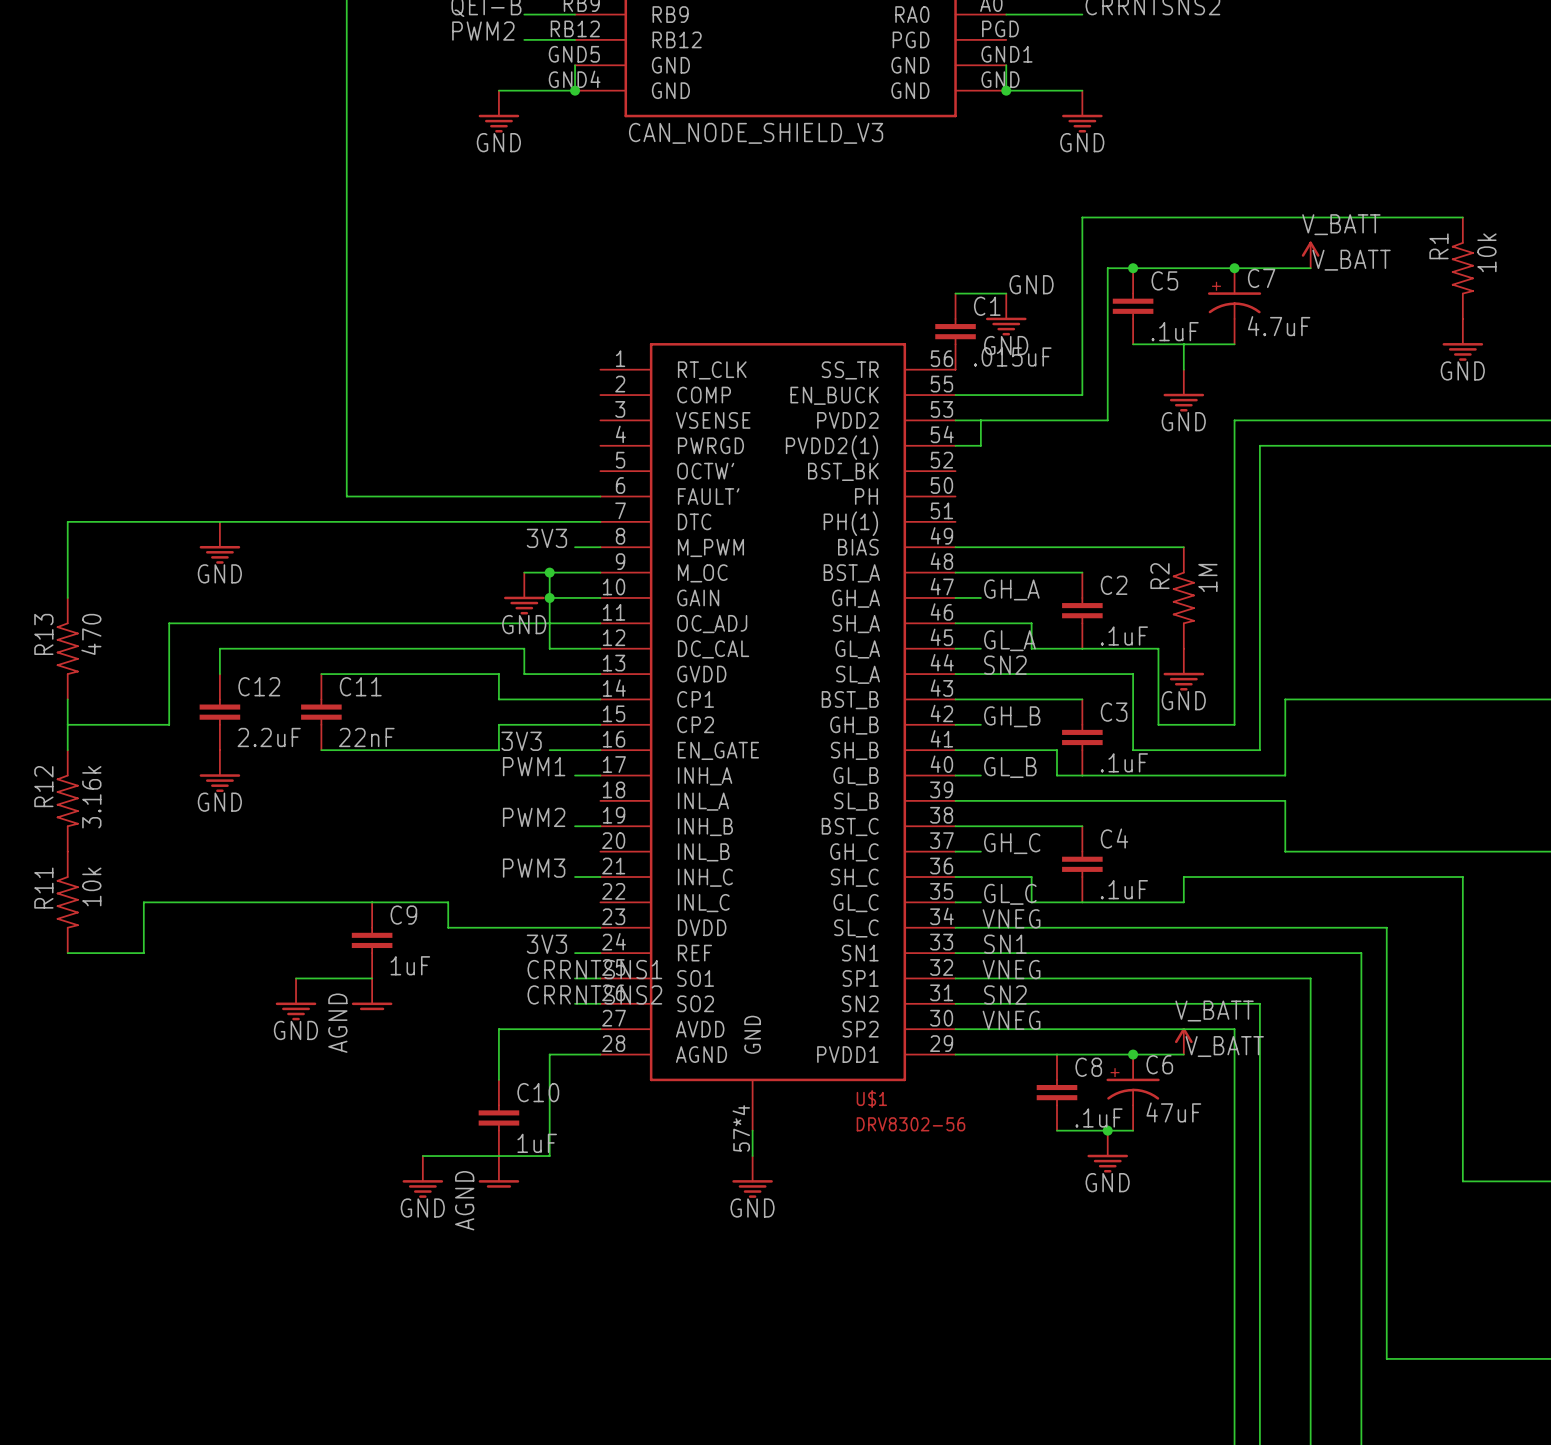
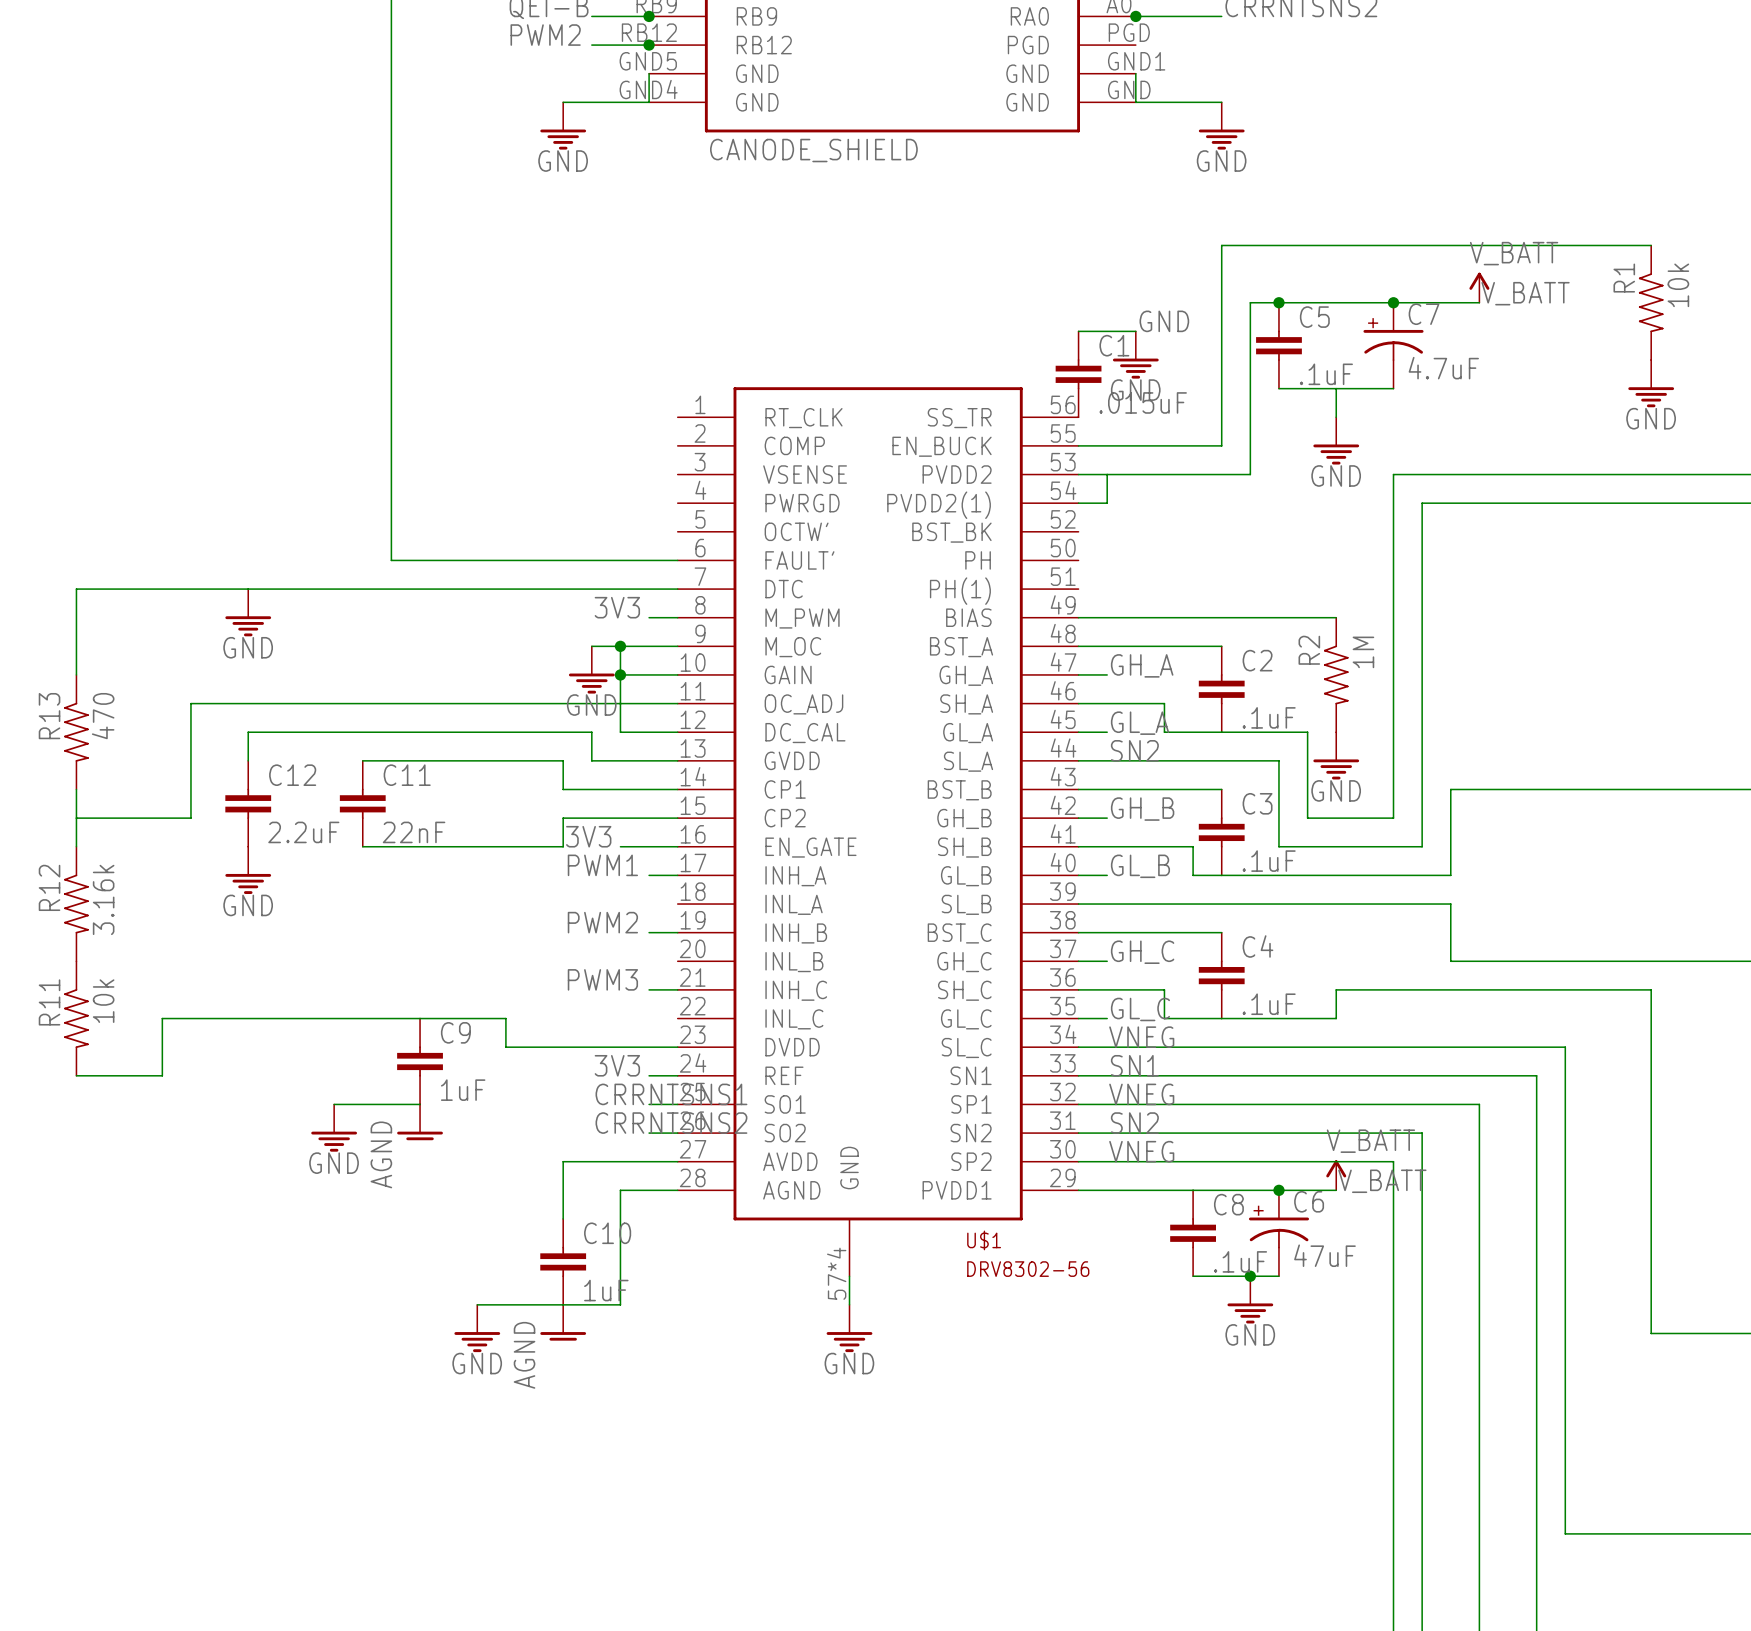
junction: none -> (649, 16)
junction: none -> (1135, 16)
junction: none -> (649, 45)
junction: (575, 90) -> none
junction: (1006, 90) -> none
part value: CAN_NODE_SHIELD_V3 (756, 133) -> CANODE_SHIELD (813, 150)

